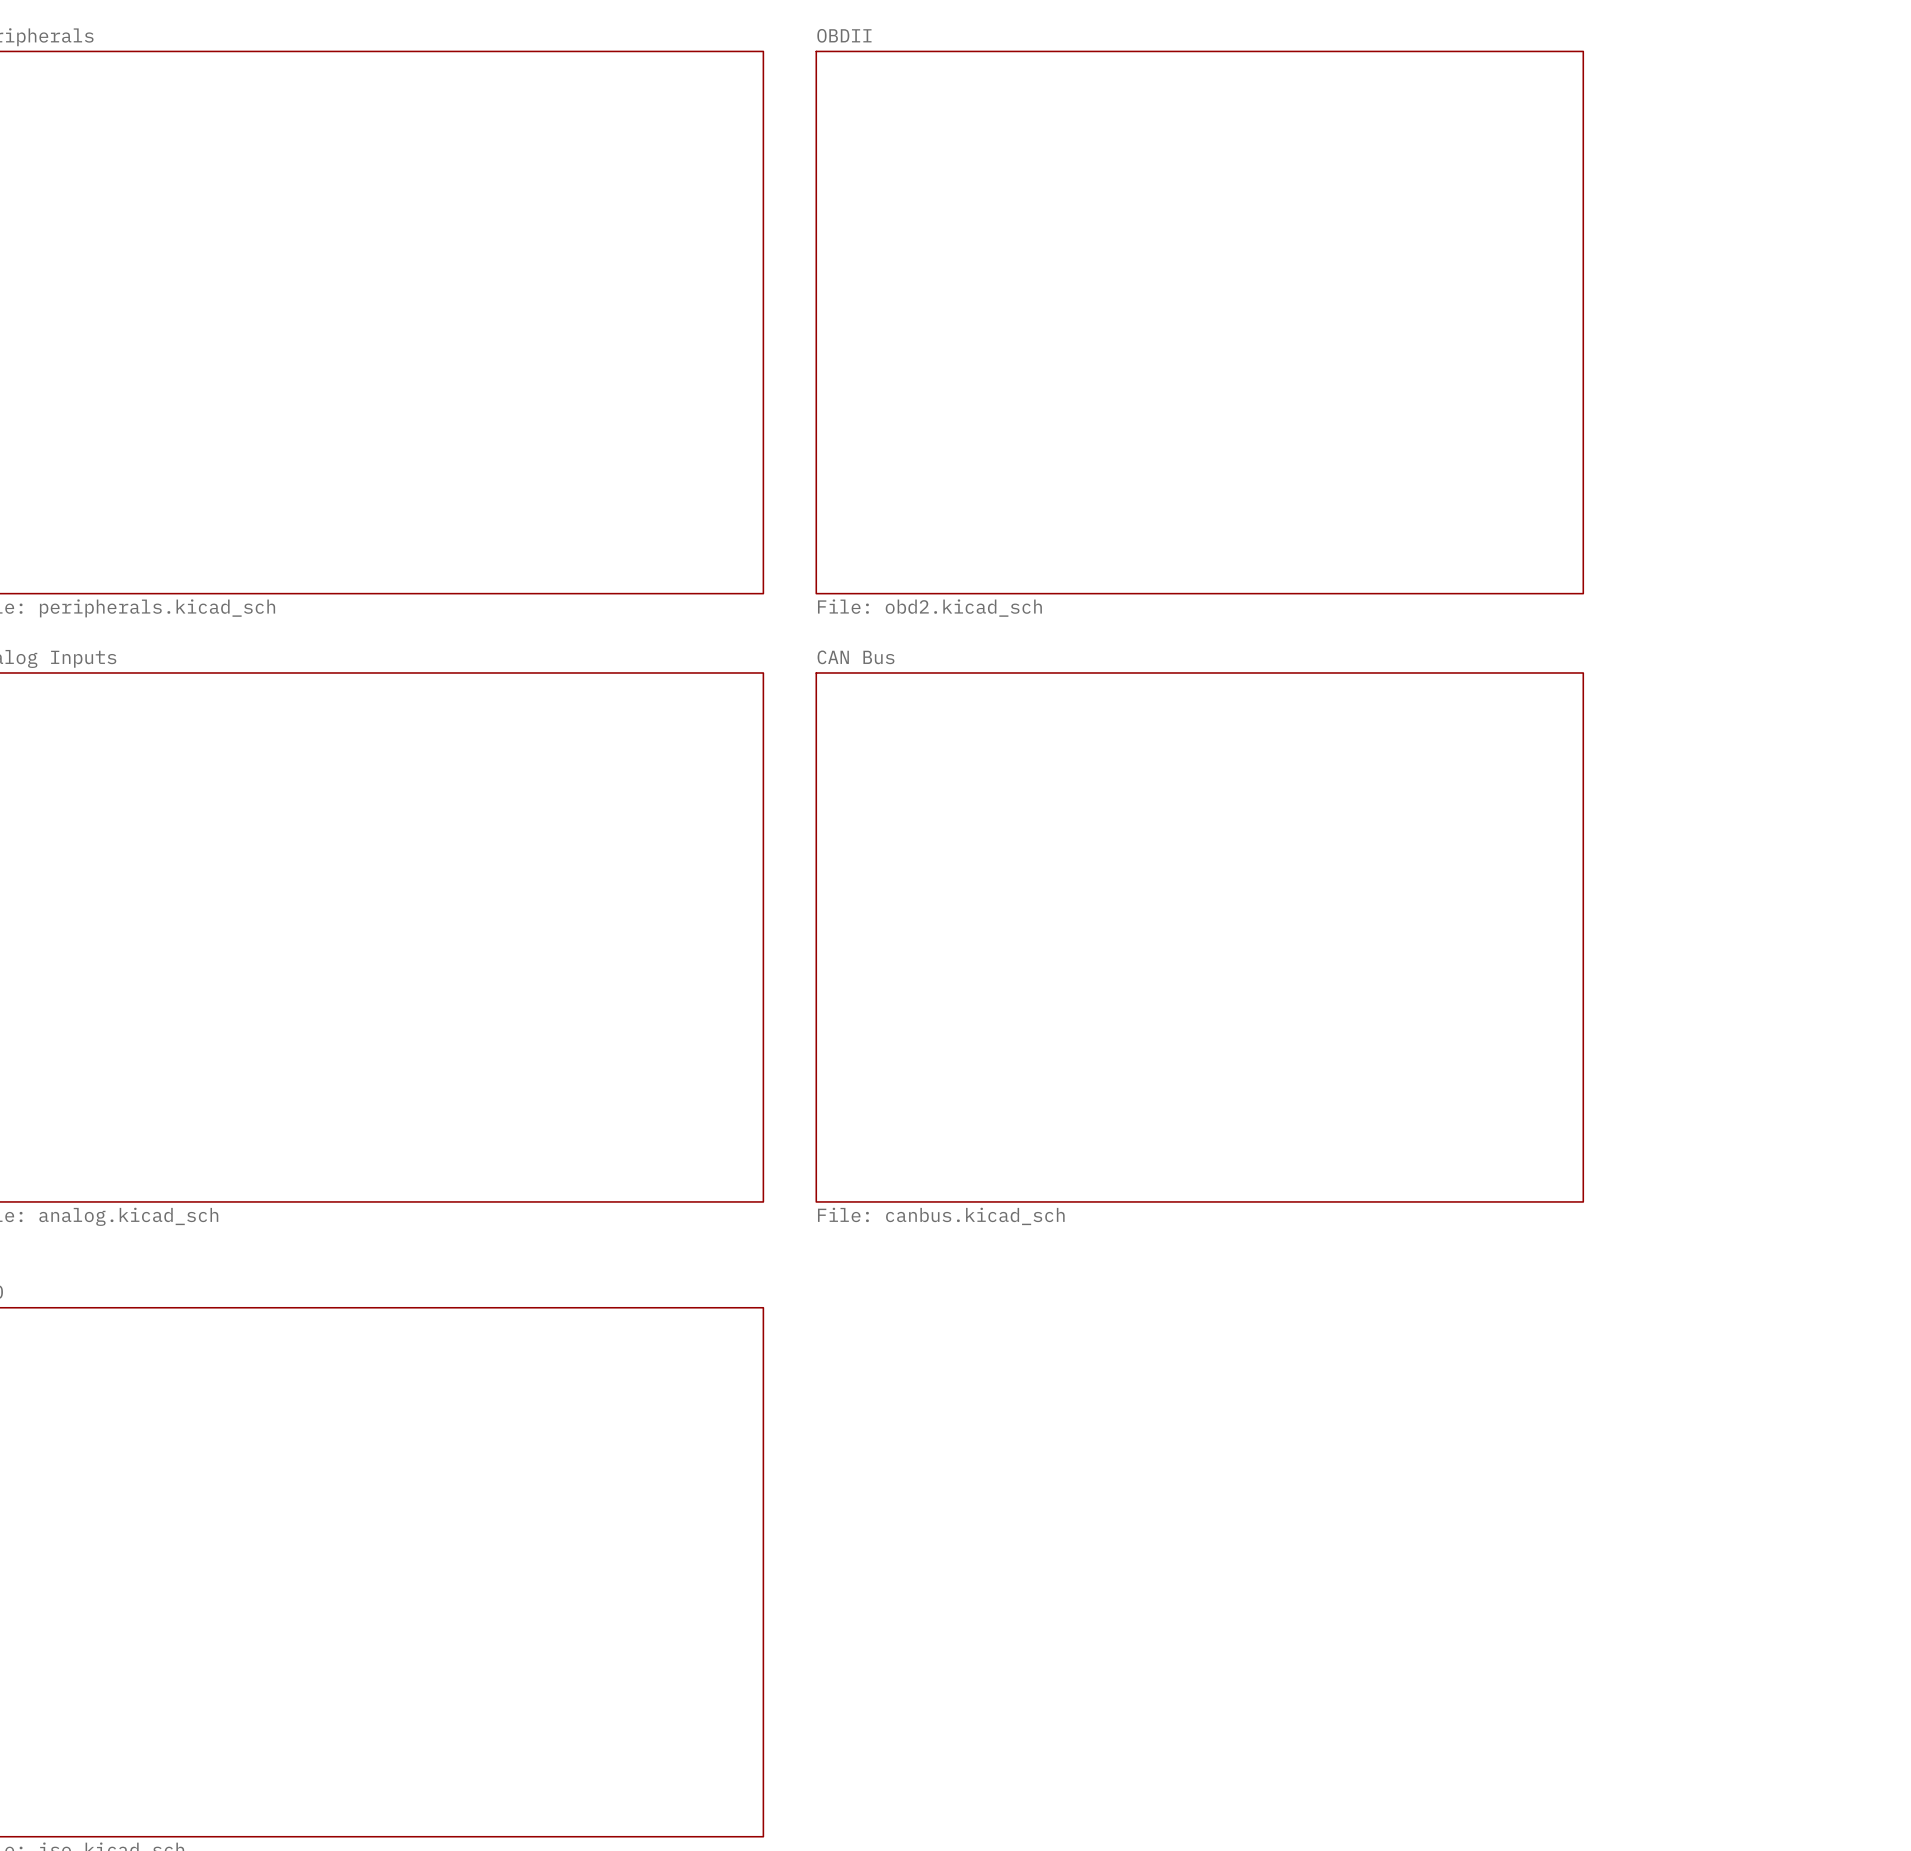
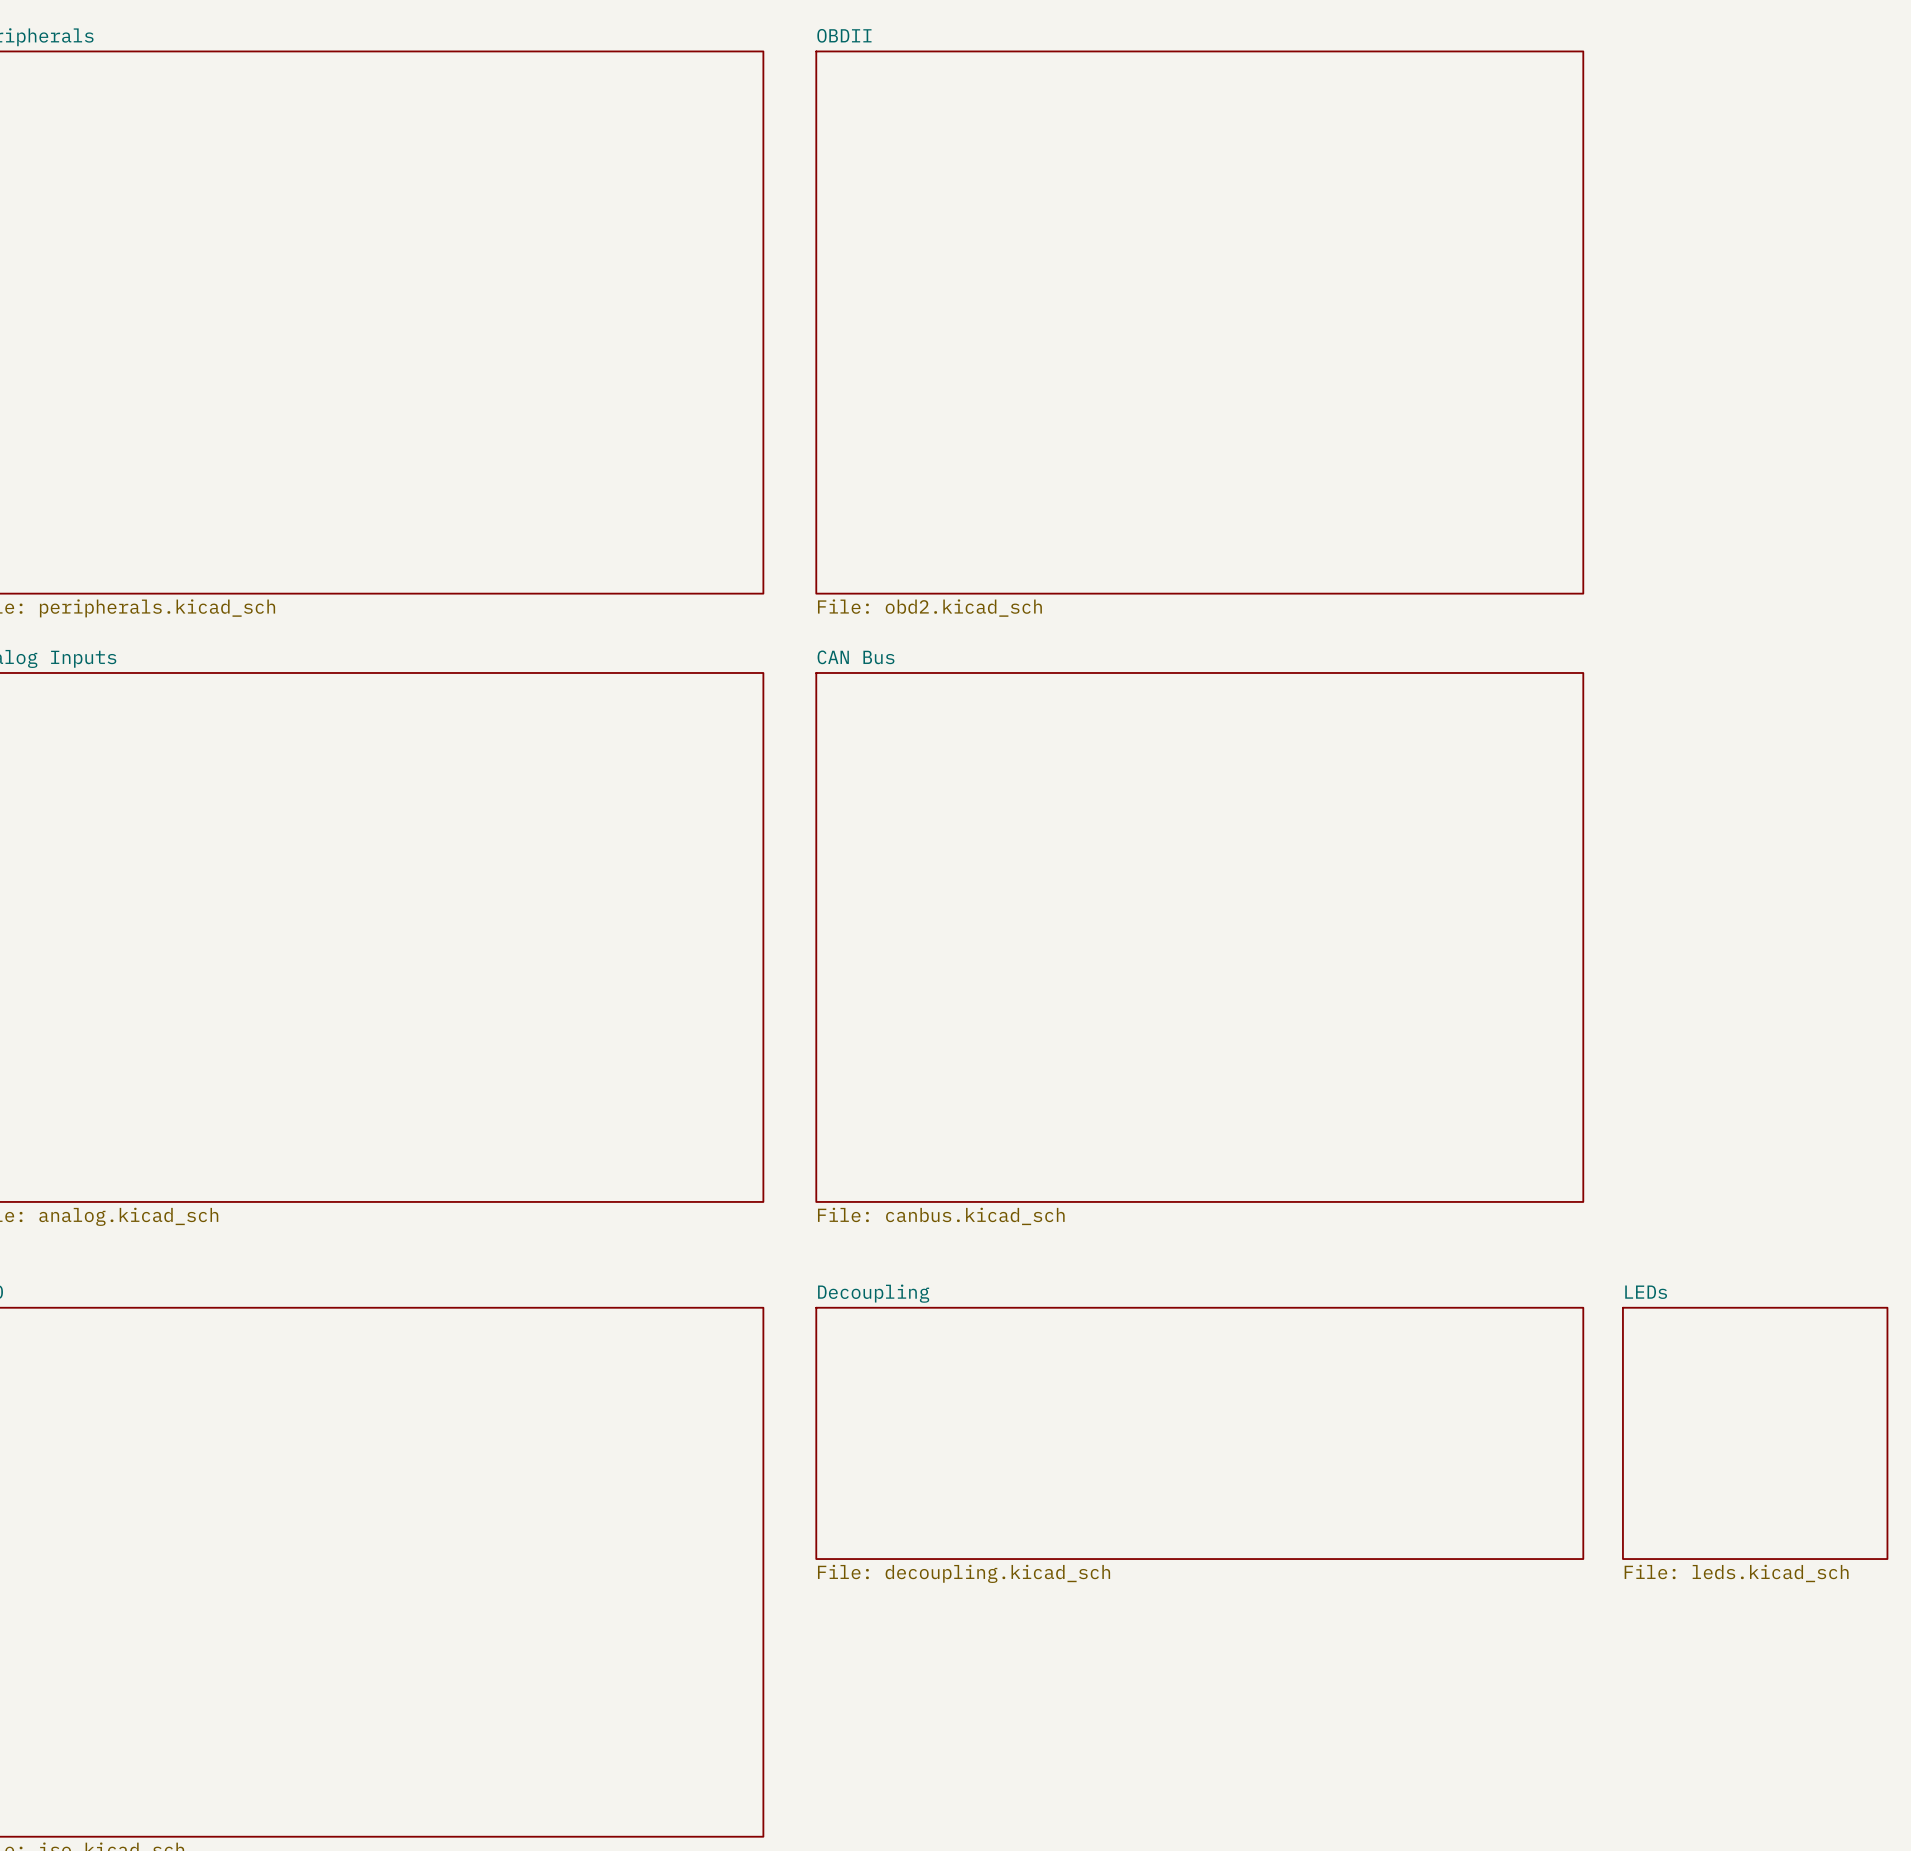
sheet Decoupling: none -> File: decoupling.kicad_sch (1199, 1433)
sheet LEDs: none -> File: leds.kicad_sch (1755, 1433)

